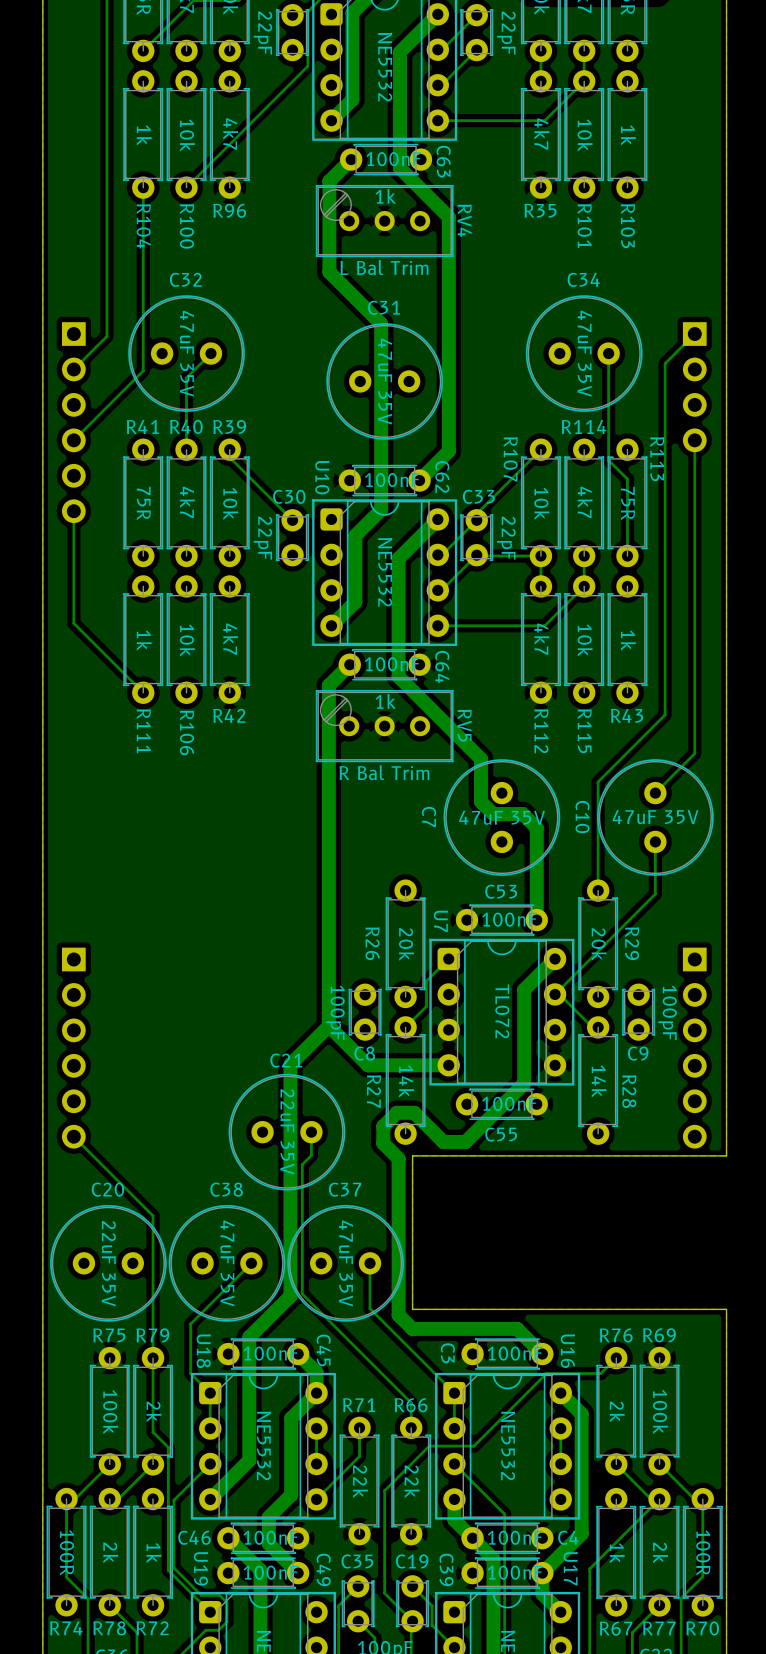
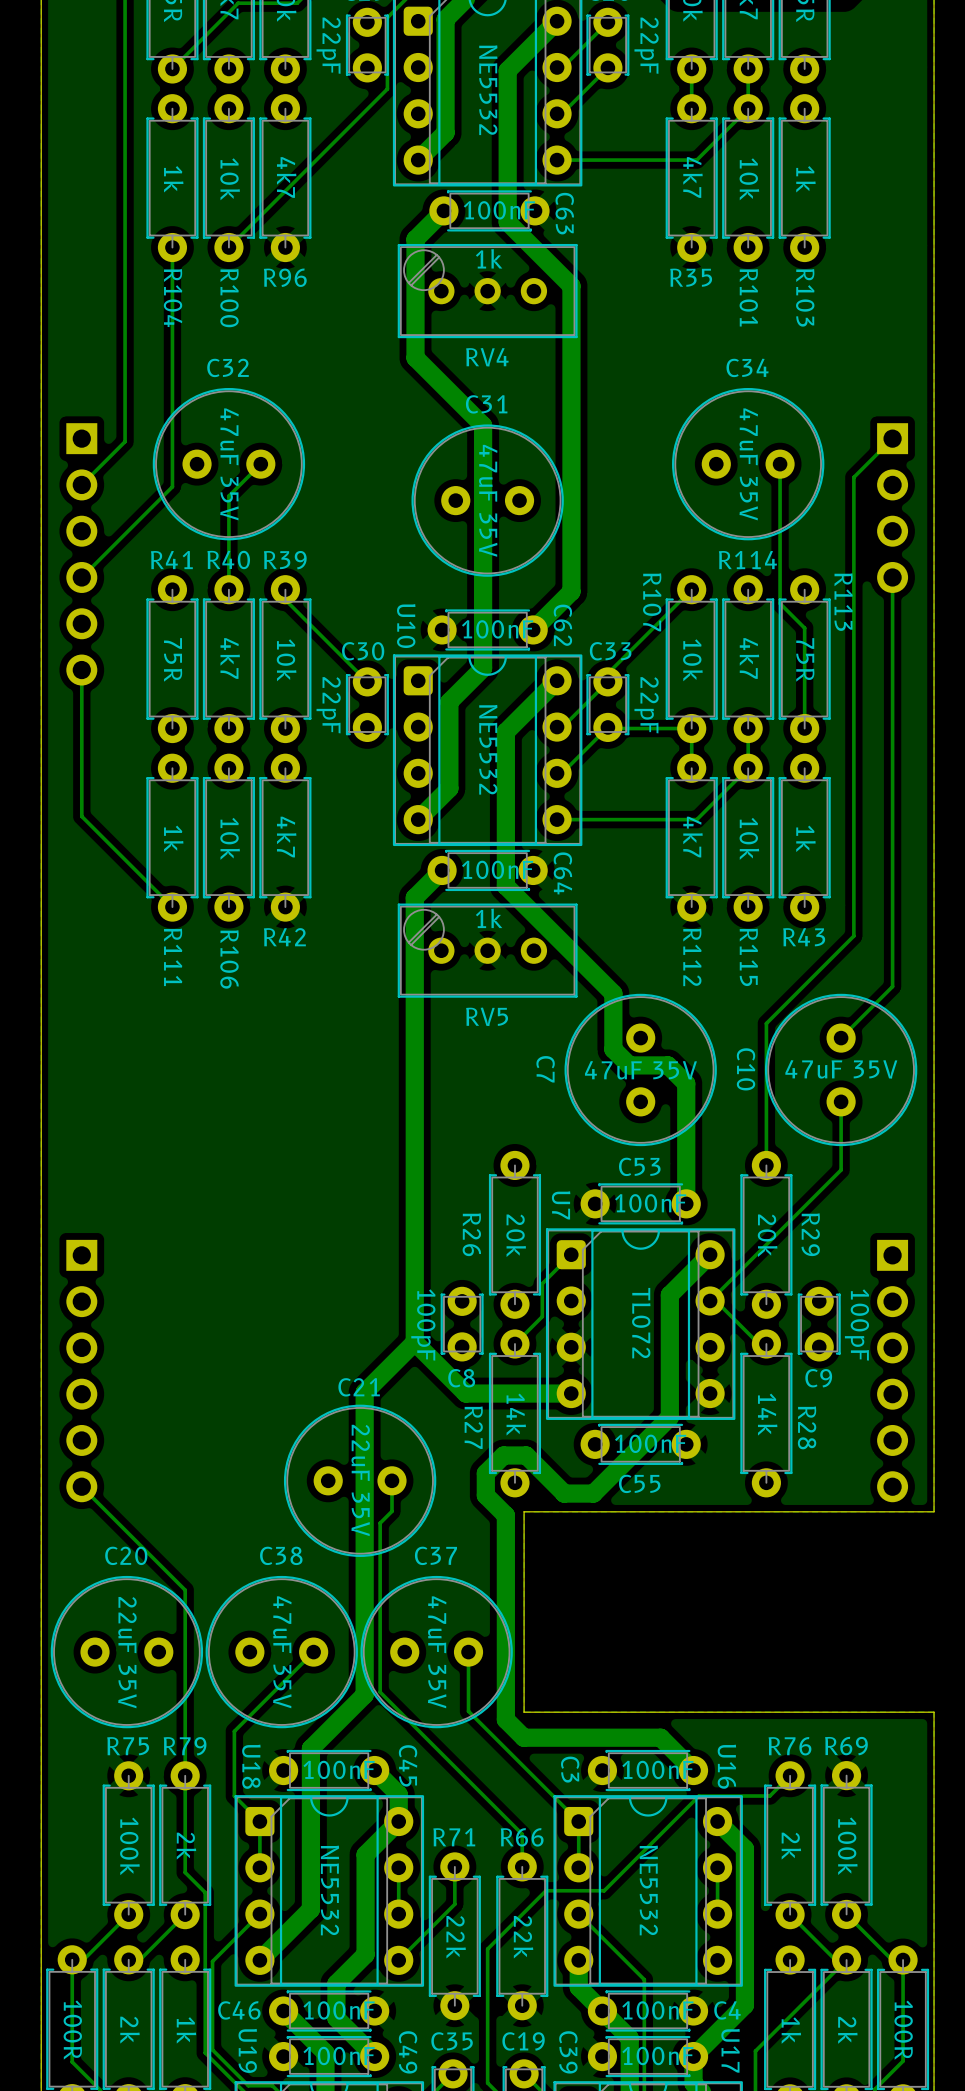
RV4 name rotation: 0° (464, 220) -> 90° counterclockwise (487, 357)
RV4 name position: RV4 (464, 220) -> RV4 (487, 357)
RV4 text: L Bal Trim (384, 267) -> none
RV5 name rotation: 0° (464, 725) -> 90° counterclockwise (487, 1016)
RV5 name position: RV5 (464, 725) -> RV5 (487, 1016)
RV5 text: R Bal Trim (384, 772) -> none

